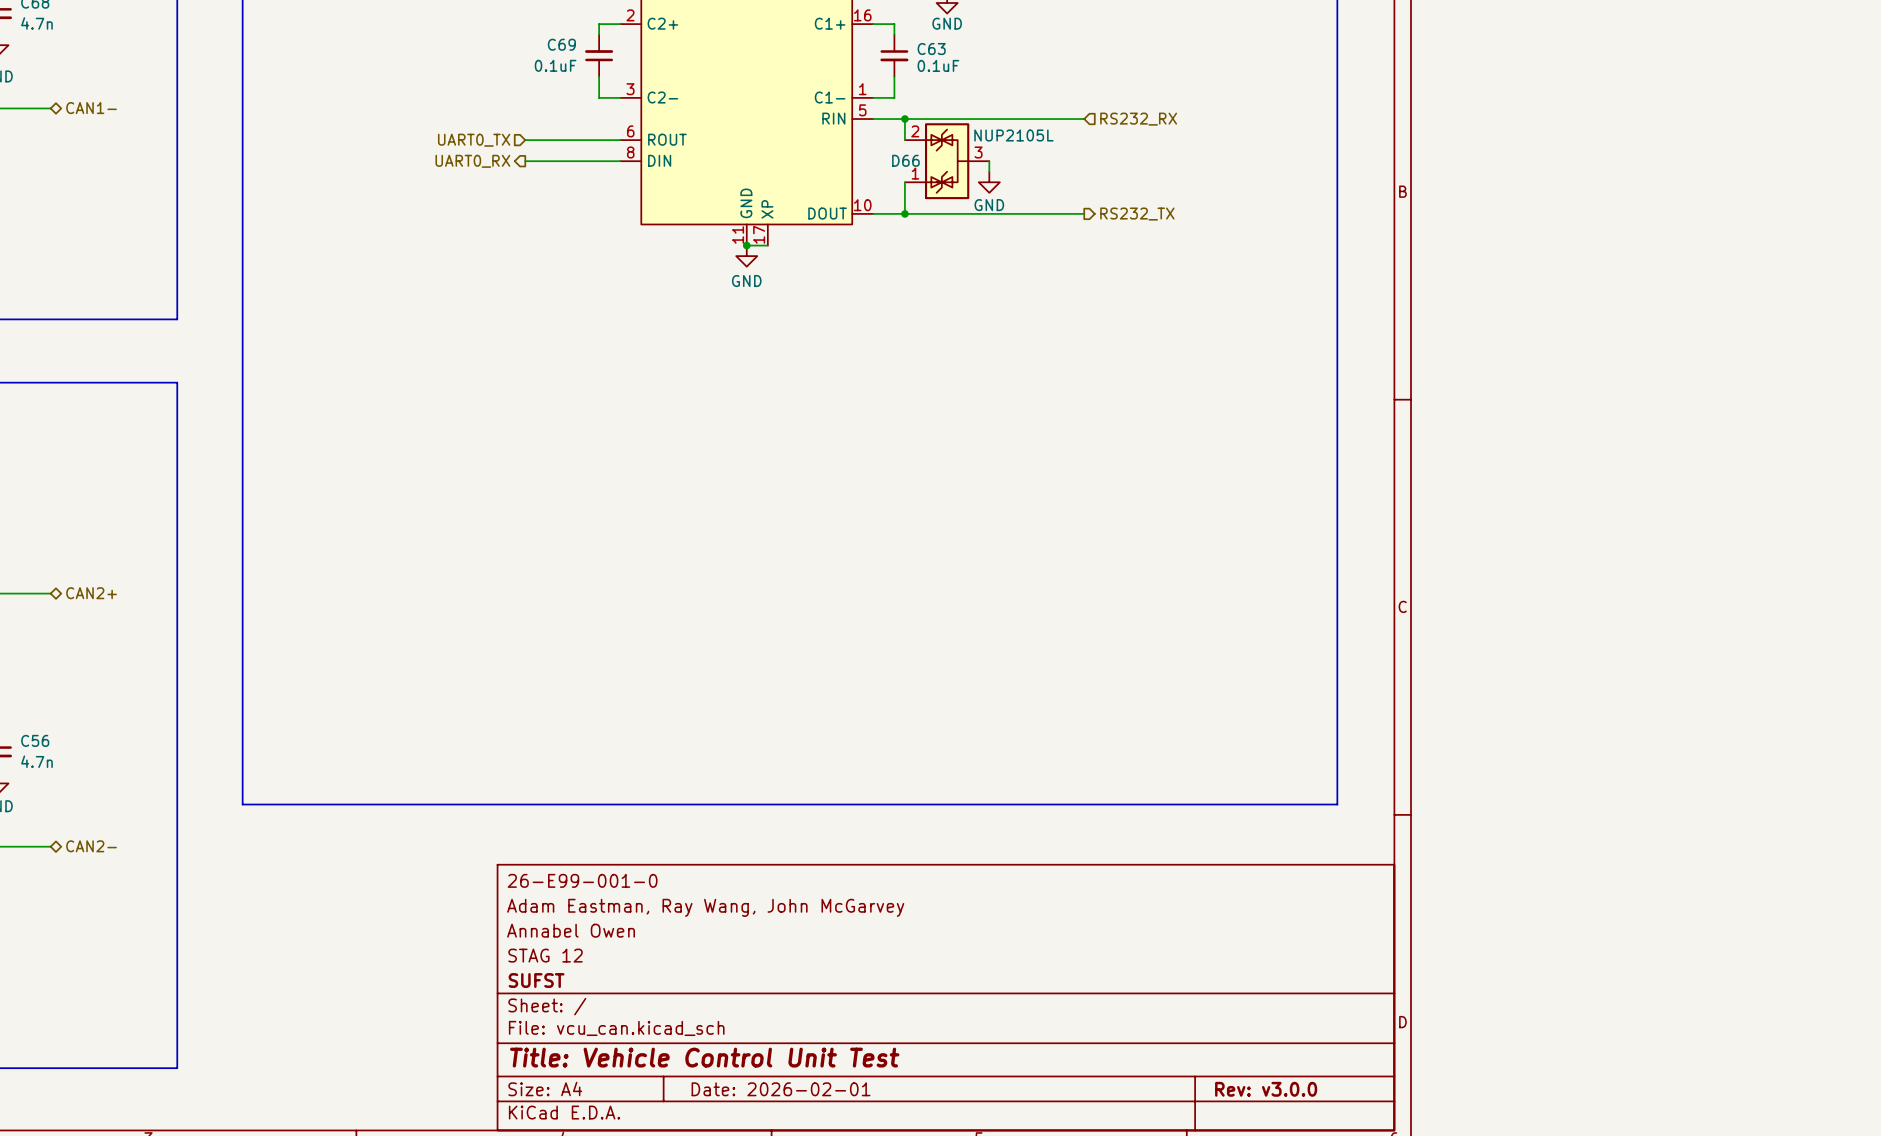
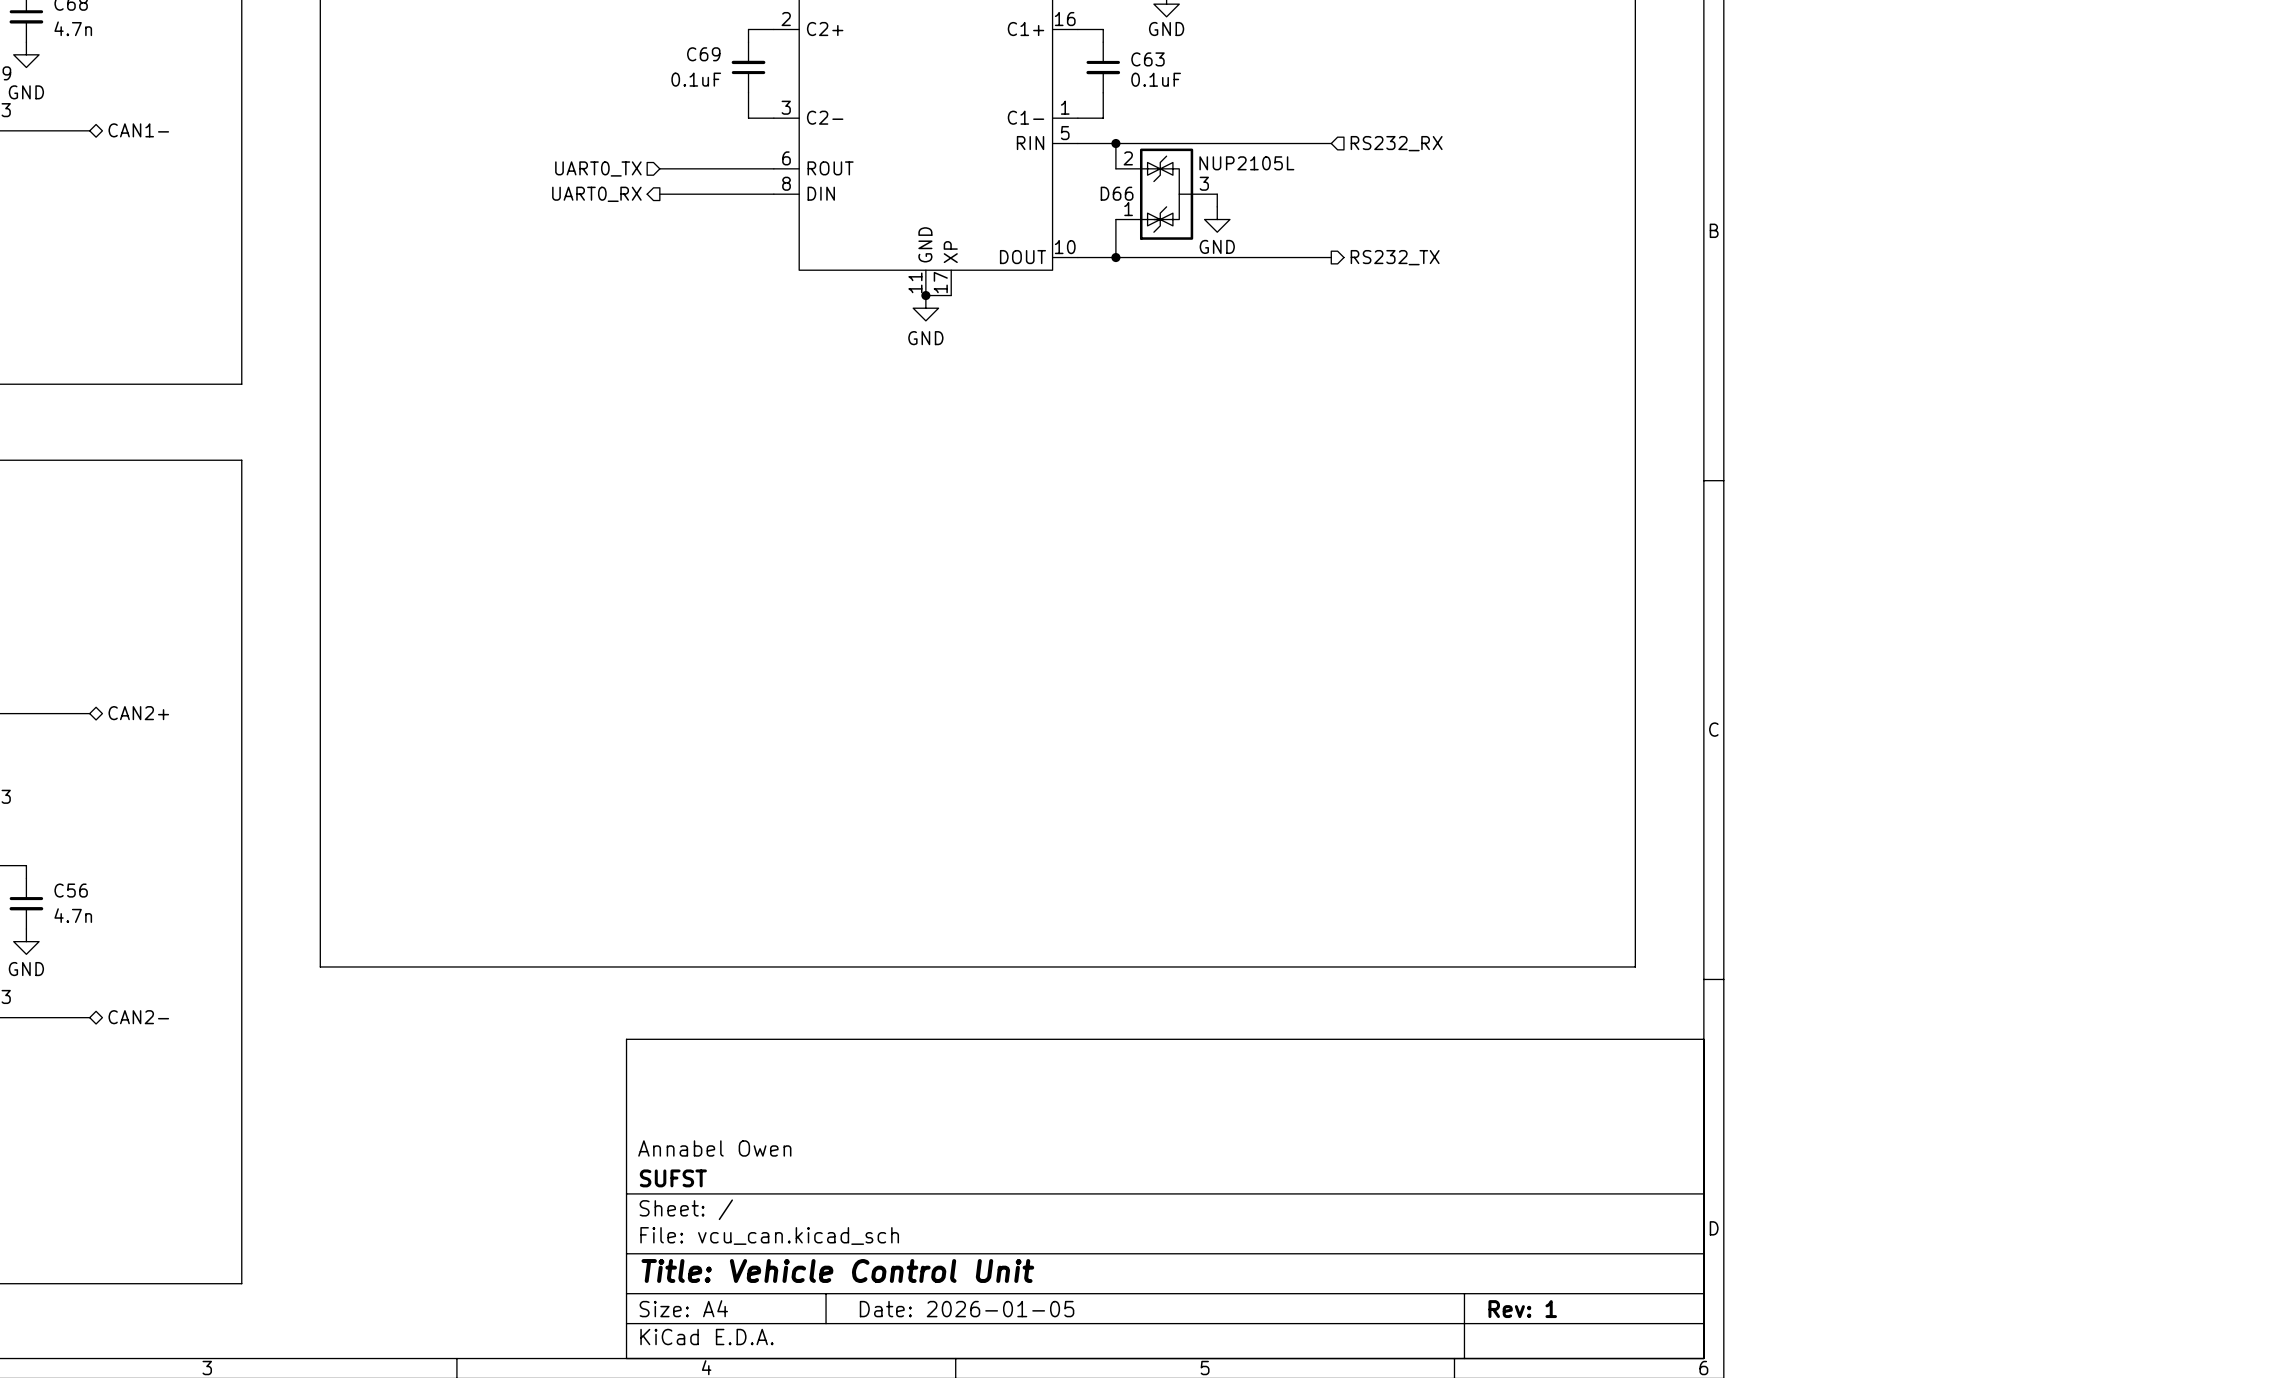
title block: 26-E99-001-0 (582, 880) -> none
title block: Adam Eastman, Ray Wang, John McGarvey (705, 907) -> none
title block: Annabel Owen (571, 930) -> none
title block: STAG 12 (545, 955) -> Annabel Owen (714, 1148)
title block: Title: Vehicle Control Unit Test (704, 1057) -> Title: Vehicle Control Unit (837, 1270)
title block: Date: 2026-02-01 (781, 1089) -> Date: 2026-01-05 (967, 1309)
title block: Rev: v3.0.0 (1266, 1089) -> Rev: 1 (1522, 1309)

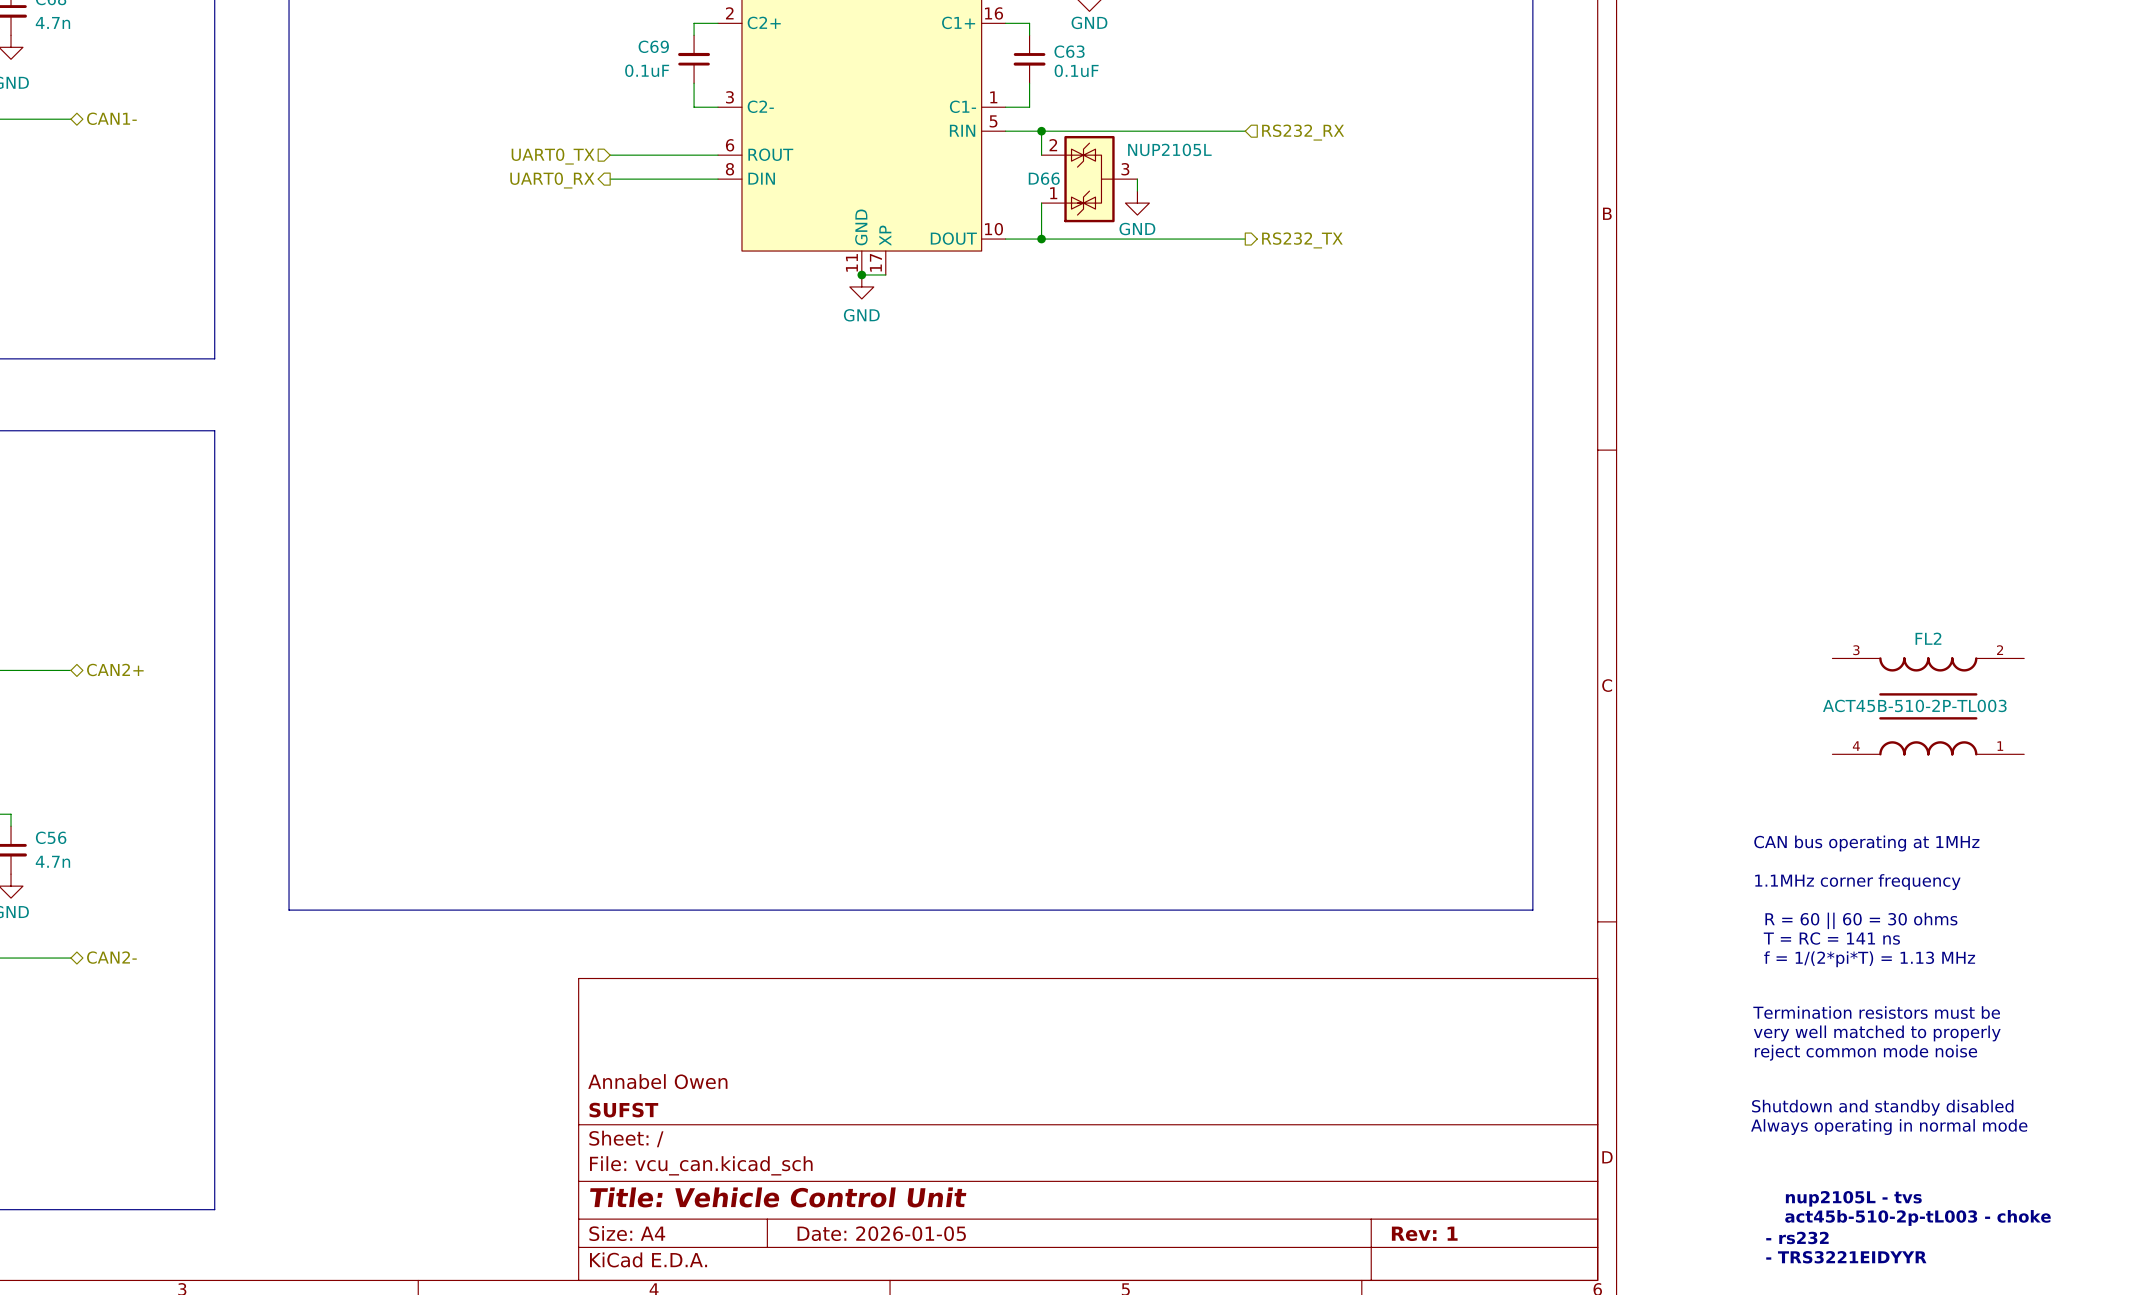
FL2: none -> ACT45B-510-2P-TL003 (1928, 706)
text: none -> CAN bus operating at 1MHz (1866, 843)
text: none -> 1.1MHz corner frequency (1857, 882)
text: none -> R = 60 || 60 = 30 ohms (1861, 920)
text: none -> T = RC = 141 ns (1831, 938)
text: none -> f = 1/(2*pi*T) = 1.13 MHz (1869, 959)
text: none -> Termination resistors must be (1876, 1012)
text: none -> very well matched to properly (1877, 1033)
text: none -> reject common mode noise (1865, 1052)
text: none -> Shutdown and standby disabled (1882, 1107)
text: none -> Always operating in normal mode (1889, 1127)
text: none -> nup2105L - tvs (1853, 1198)
text: none -> act45b-510-2p-tL003 - choke (1917, 1217)
text: none -> - rs232 (1797, 1237)
text: none -> - TRS3221EIDYYR (1846, 1257)

